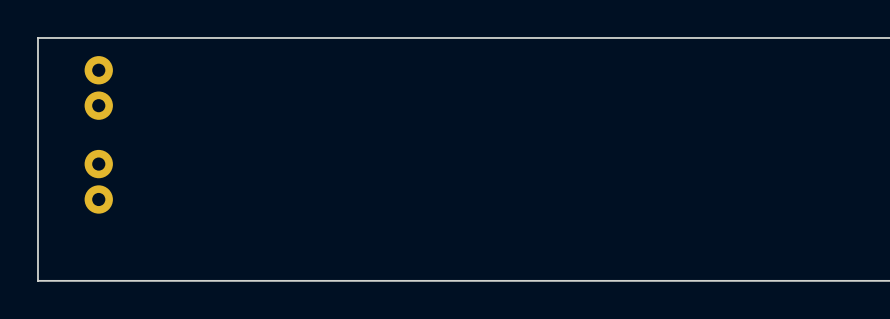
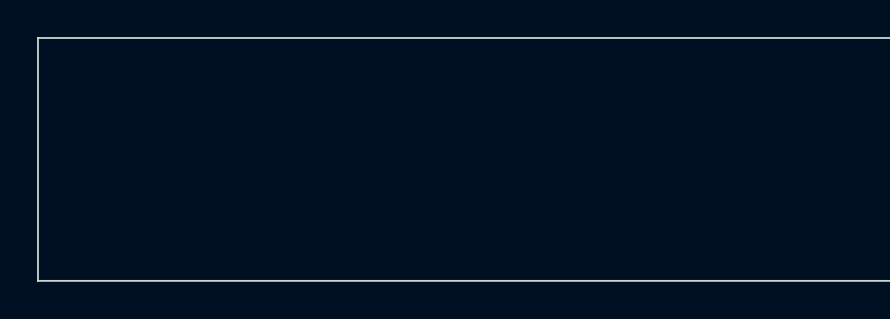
part: (98, 87) -> none
part: (98, 181) -> none

